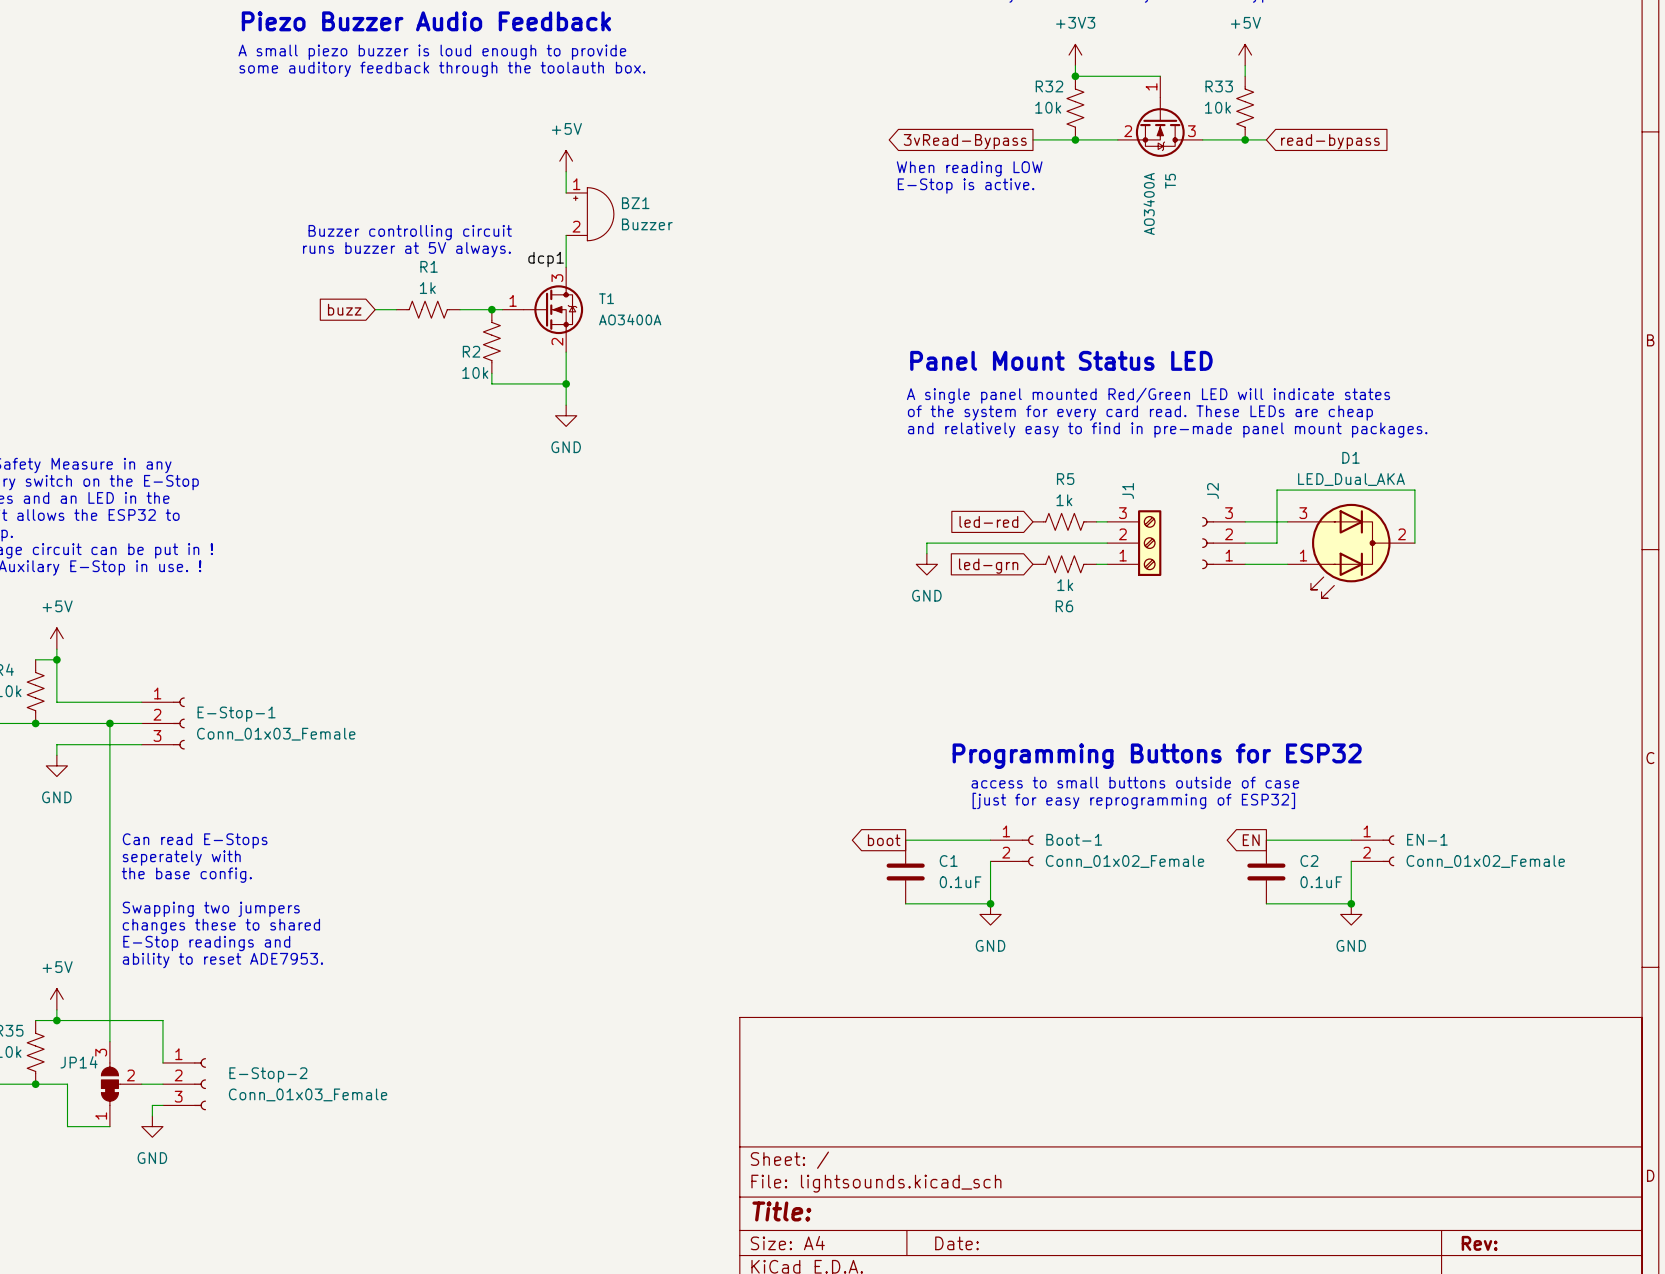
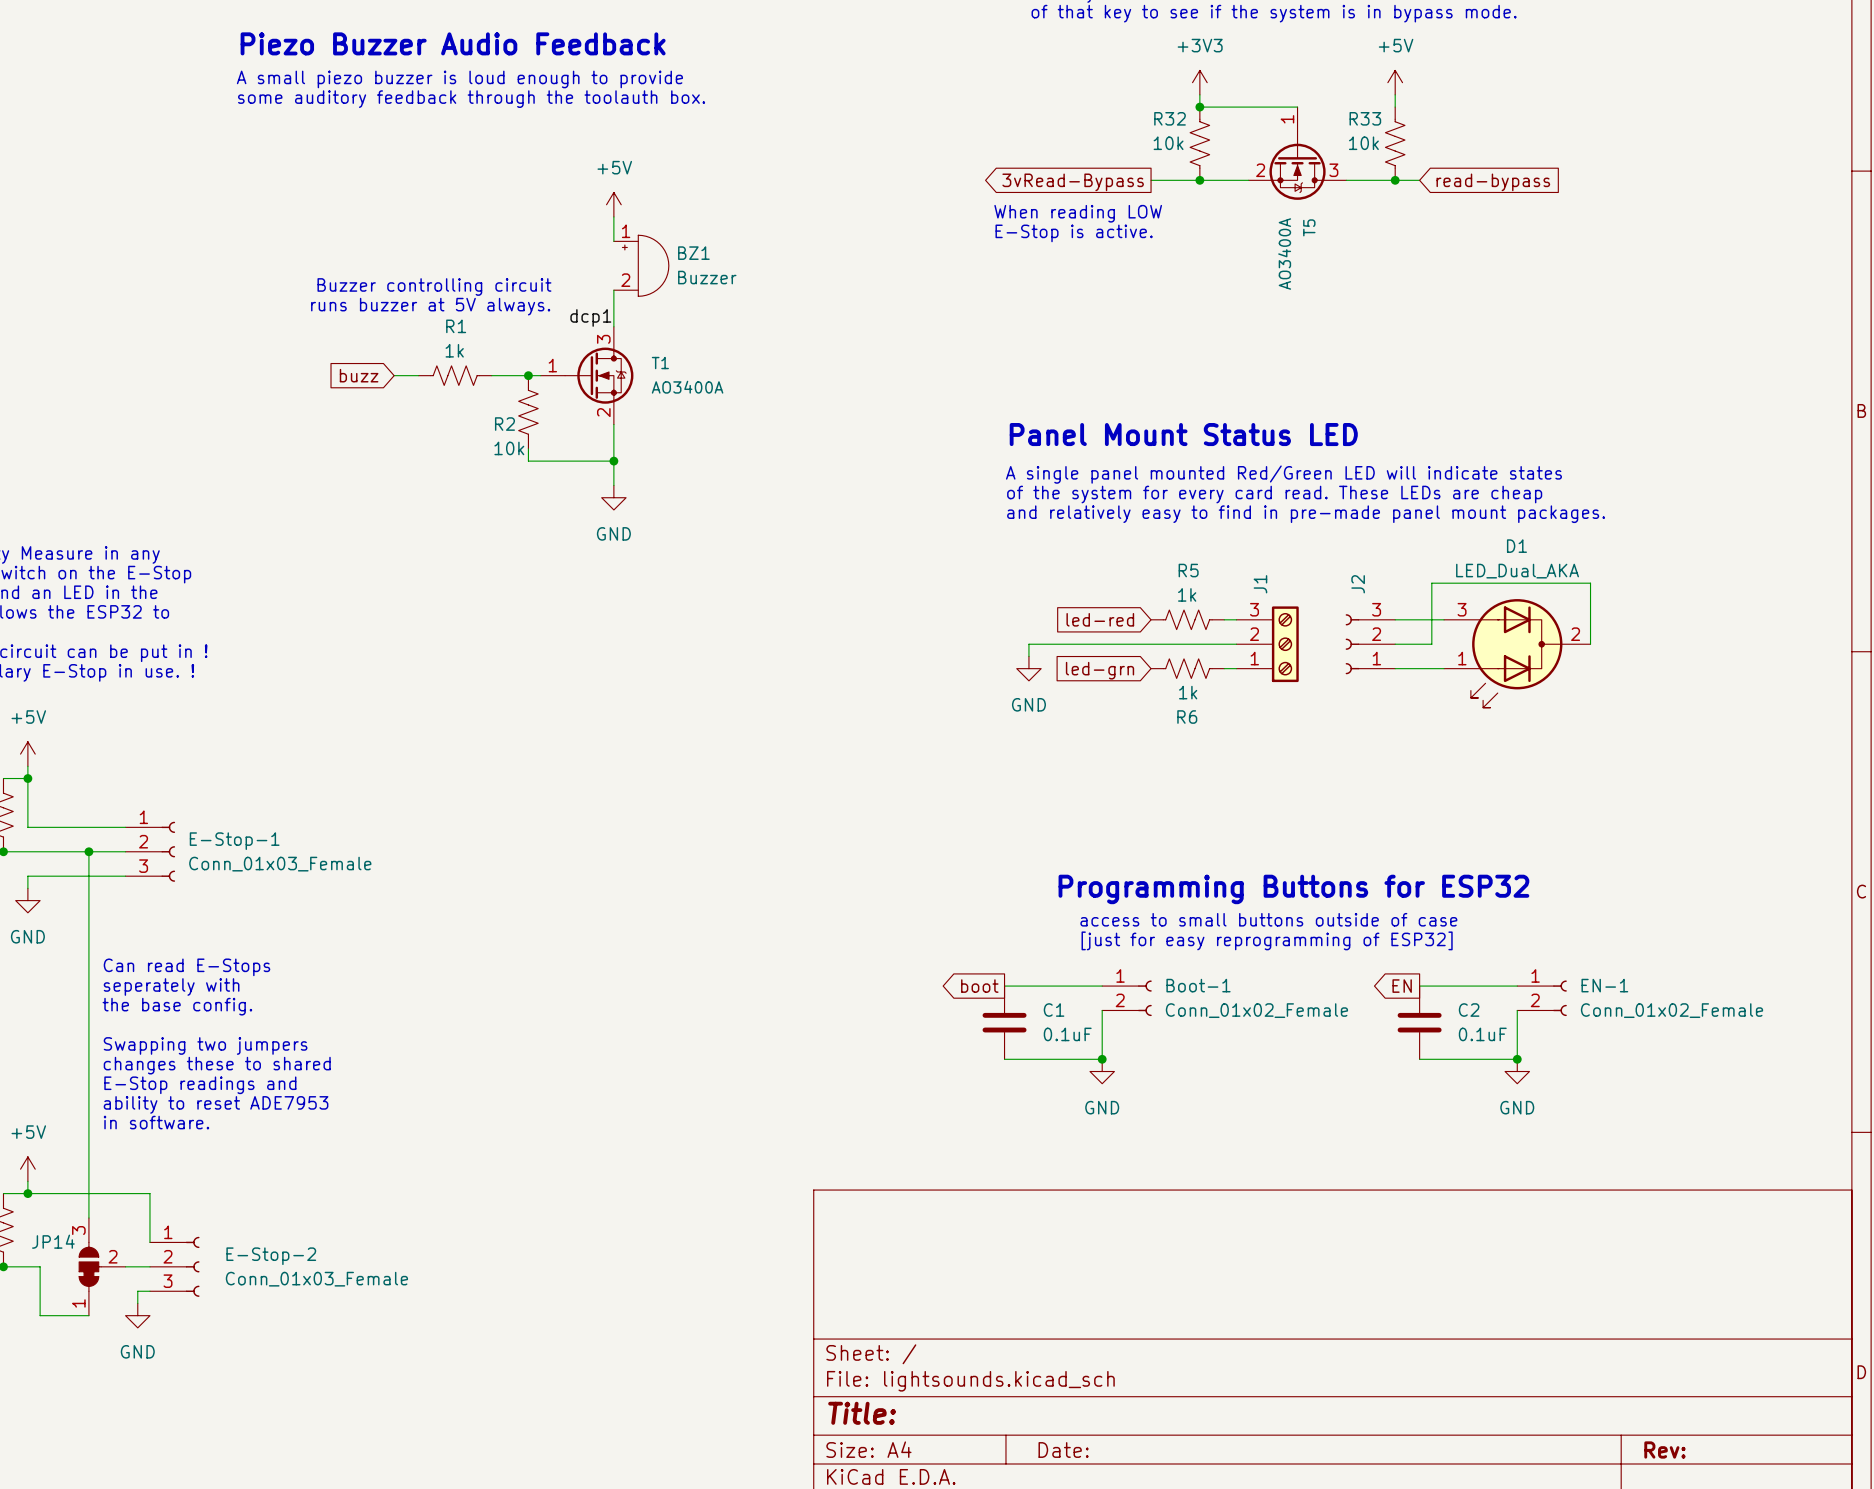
text: none -> Can read E-Stops (186, 967)
text: Can read E-Stops (195, 840) -> seperately with (171, 987)
text: seperately with (181, 858) -> the base config. (177, 1006)
text: the base config. (186, 875) -> none
text: none -> Swapping two jumpers (205, 1045)
text: Swapping two jumpers (211, 909) -> changes these to shared (217, 1065)
text: changes these to shared (221, 926) -> E-Stop readings and (200, 1085)
text: E-Stop readings and (206, 943) -> ability to reset ADE7953 (216, 1104)
text: ability to reset ADE7953. (222, 960) -> in software. (156, 1122)

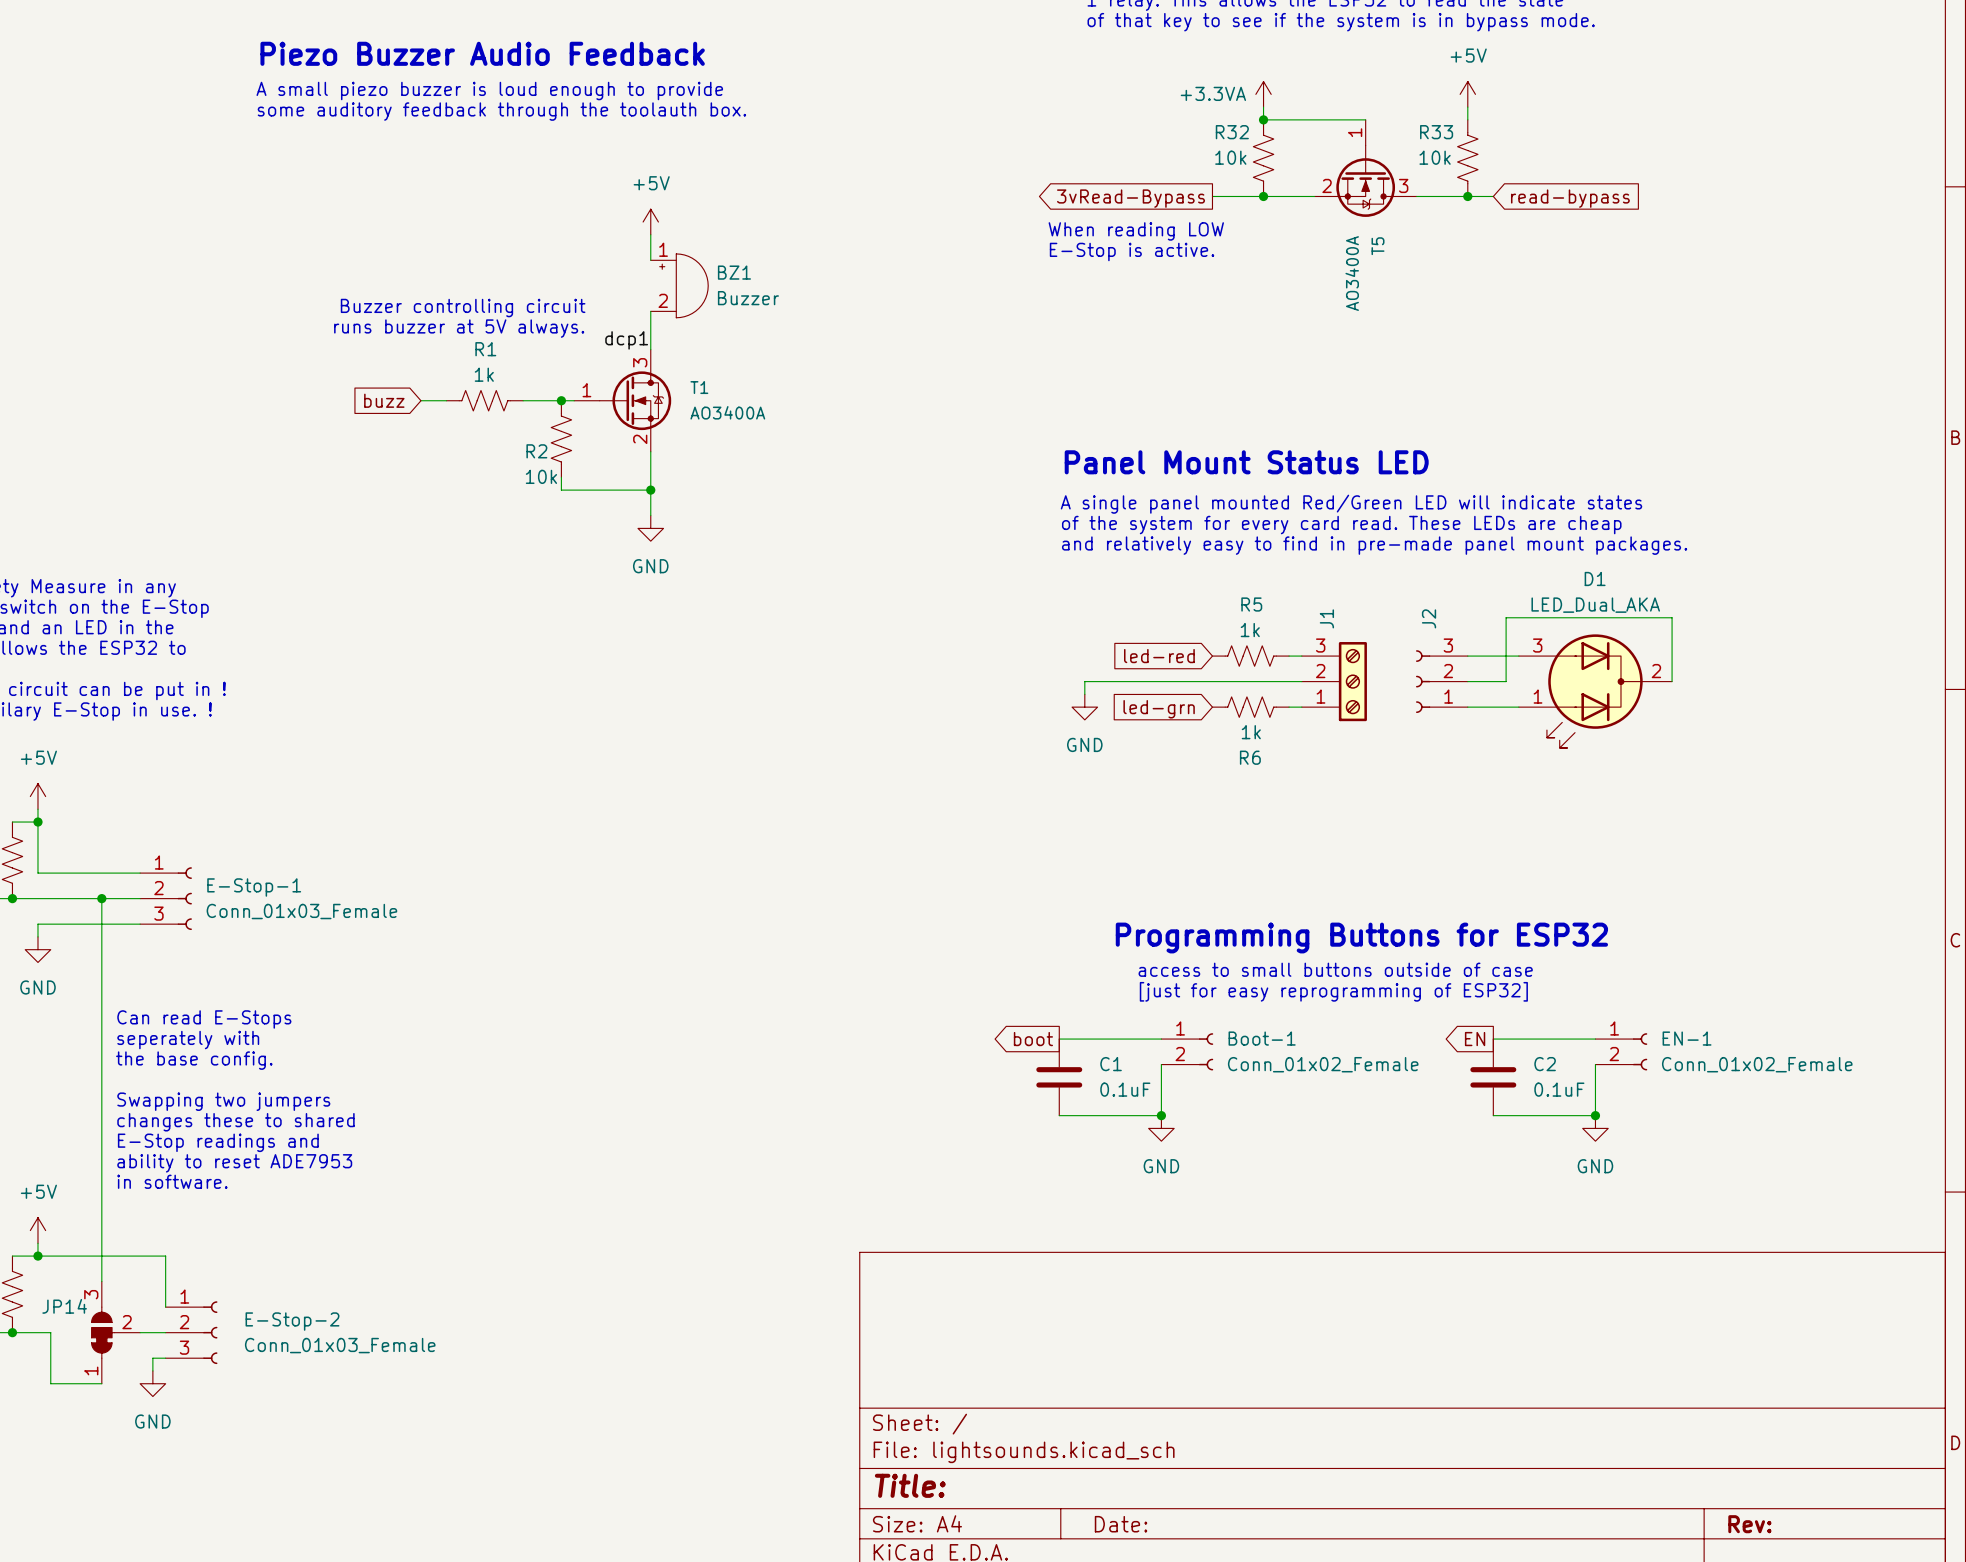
power symbol: +3V3 (1199, 82) -> +3.3VA (1263, 94)

